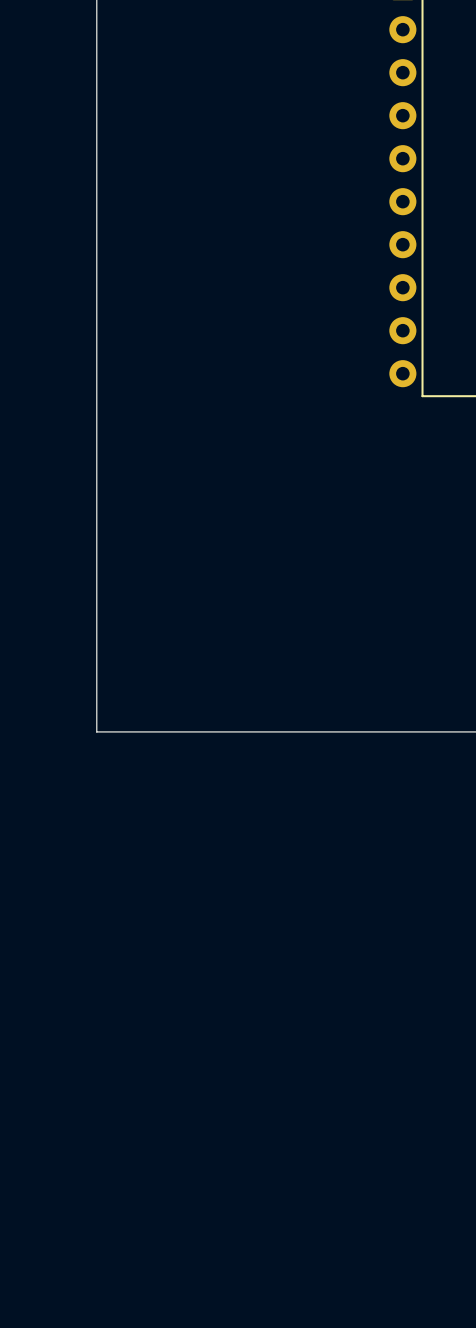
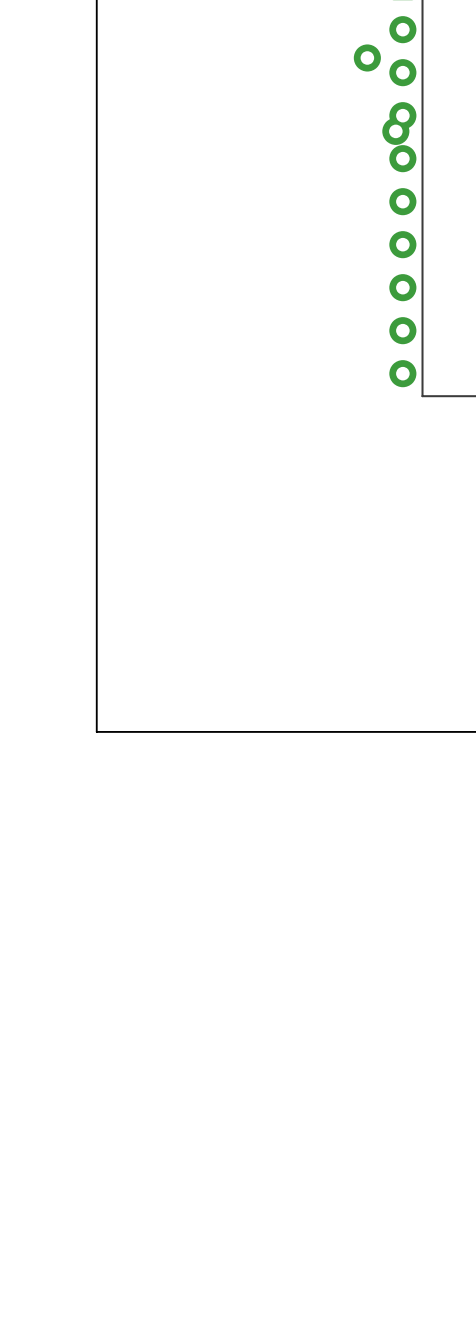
via: none -> (367, 57)
via: none -> (395, 131)

